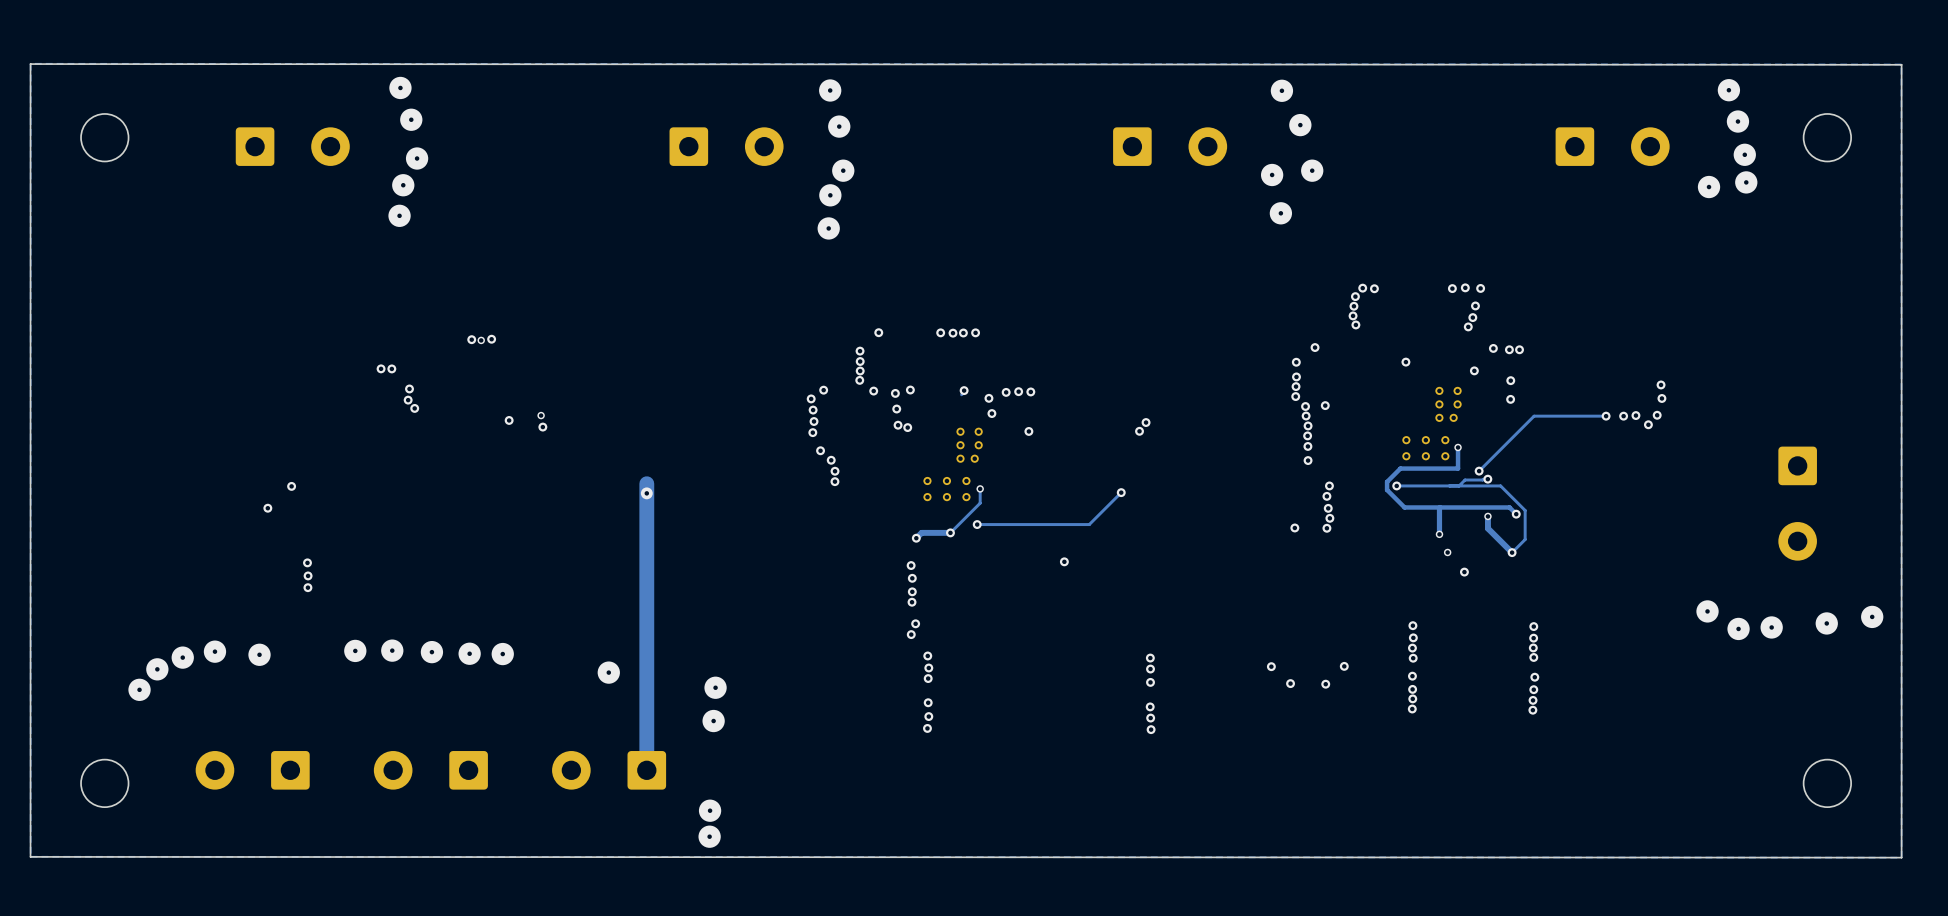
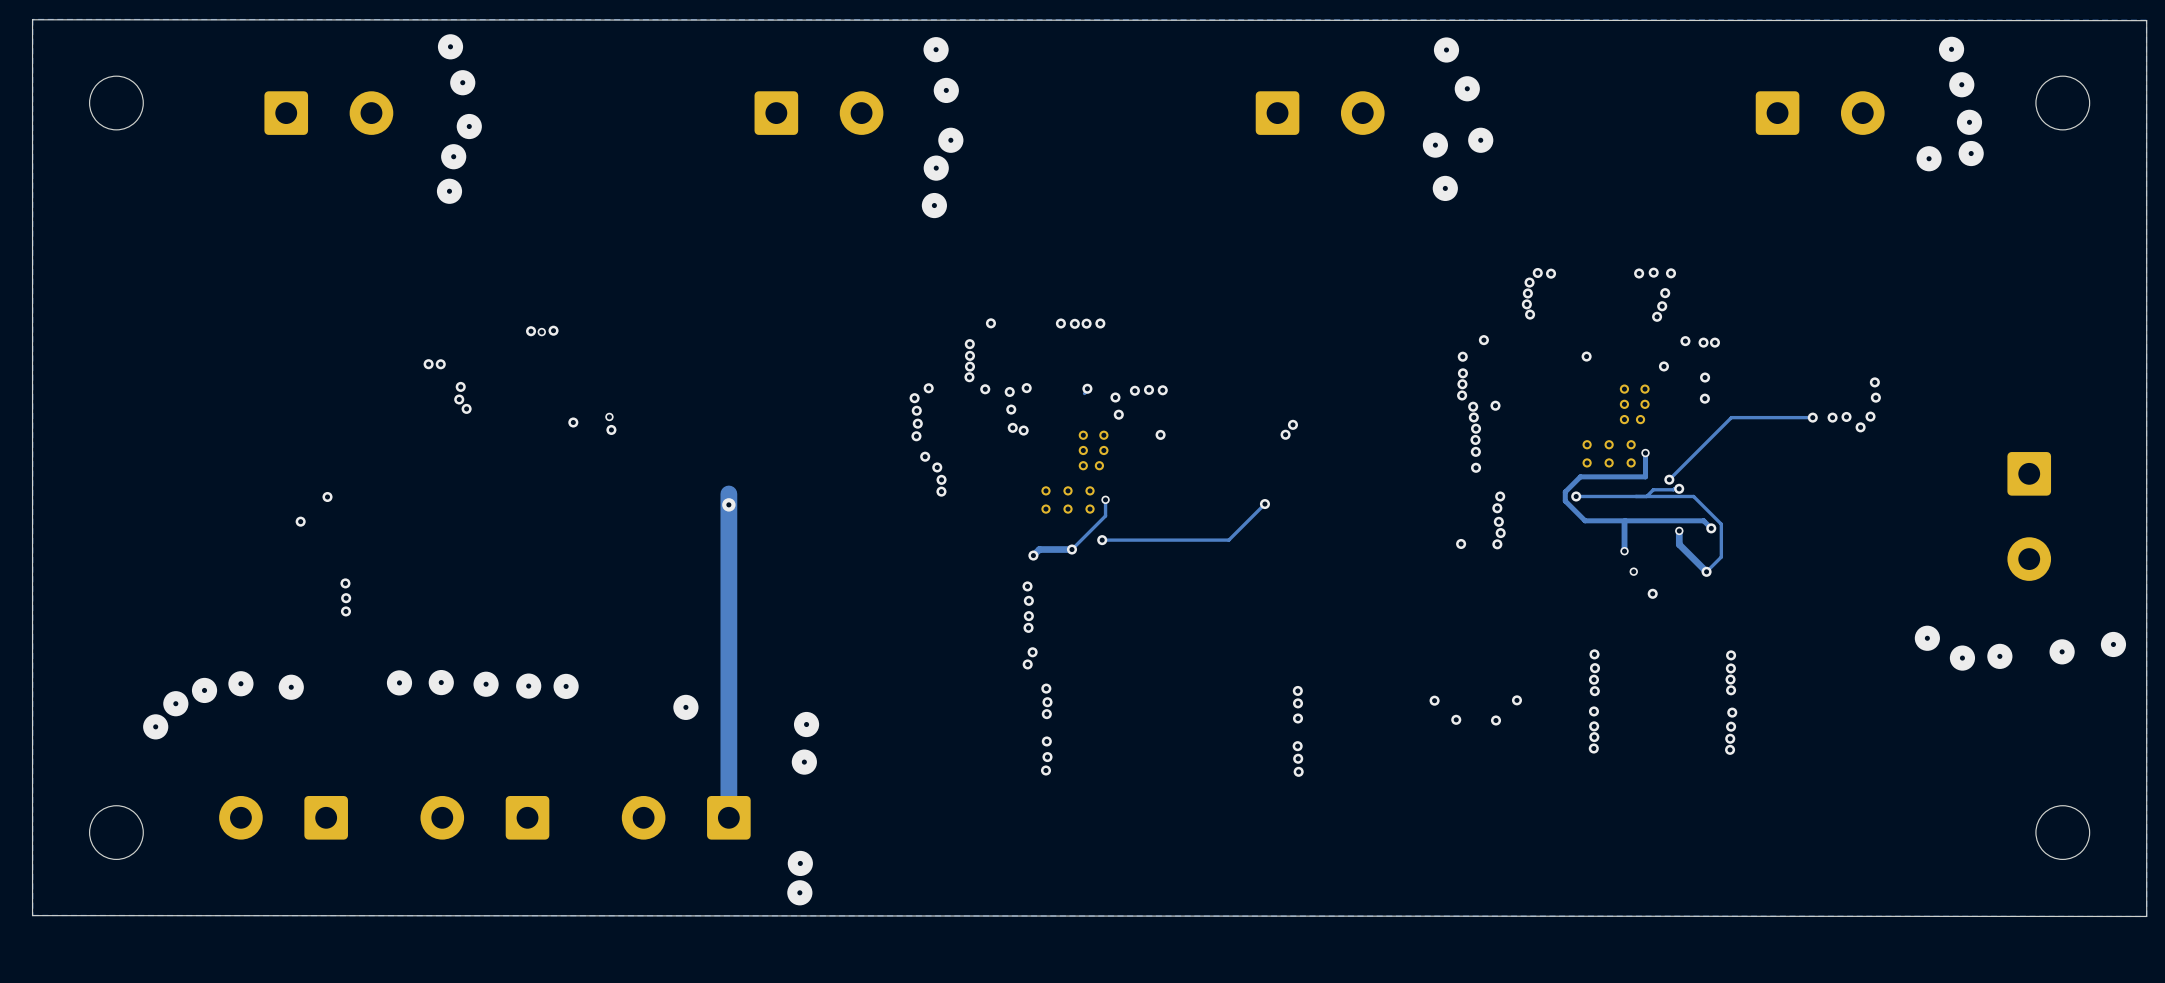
via: (1064, 561) -> none

